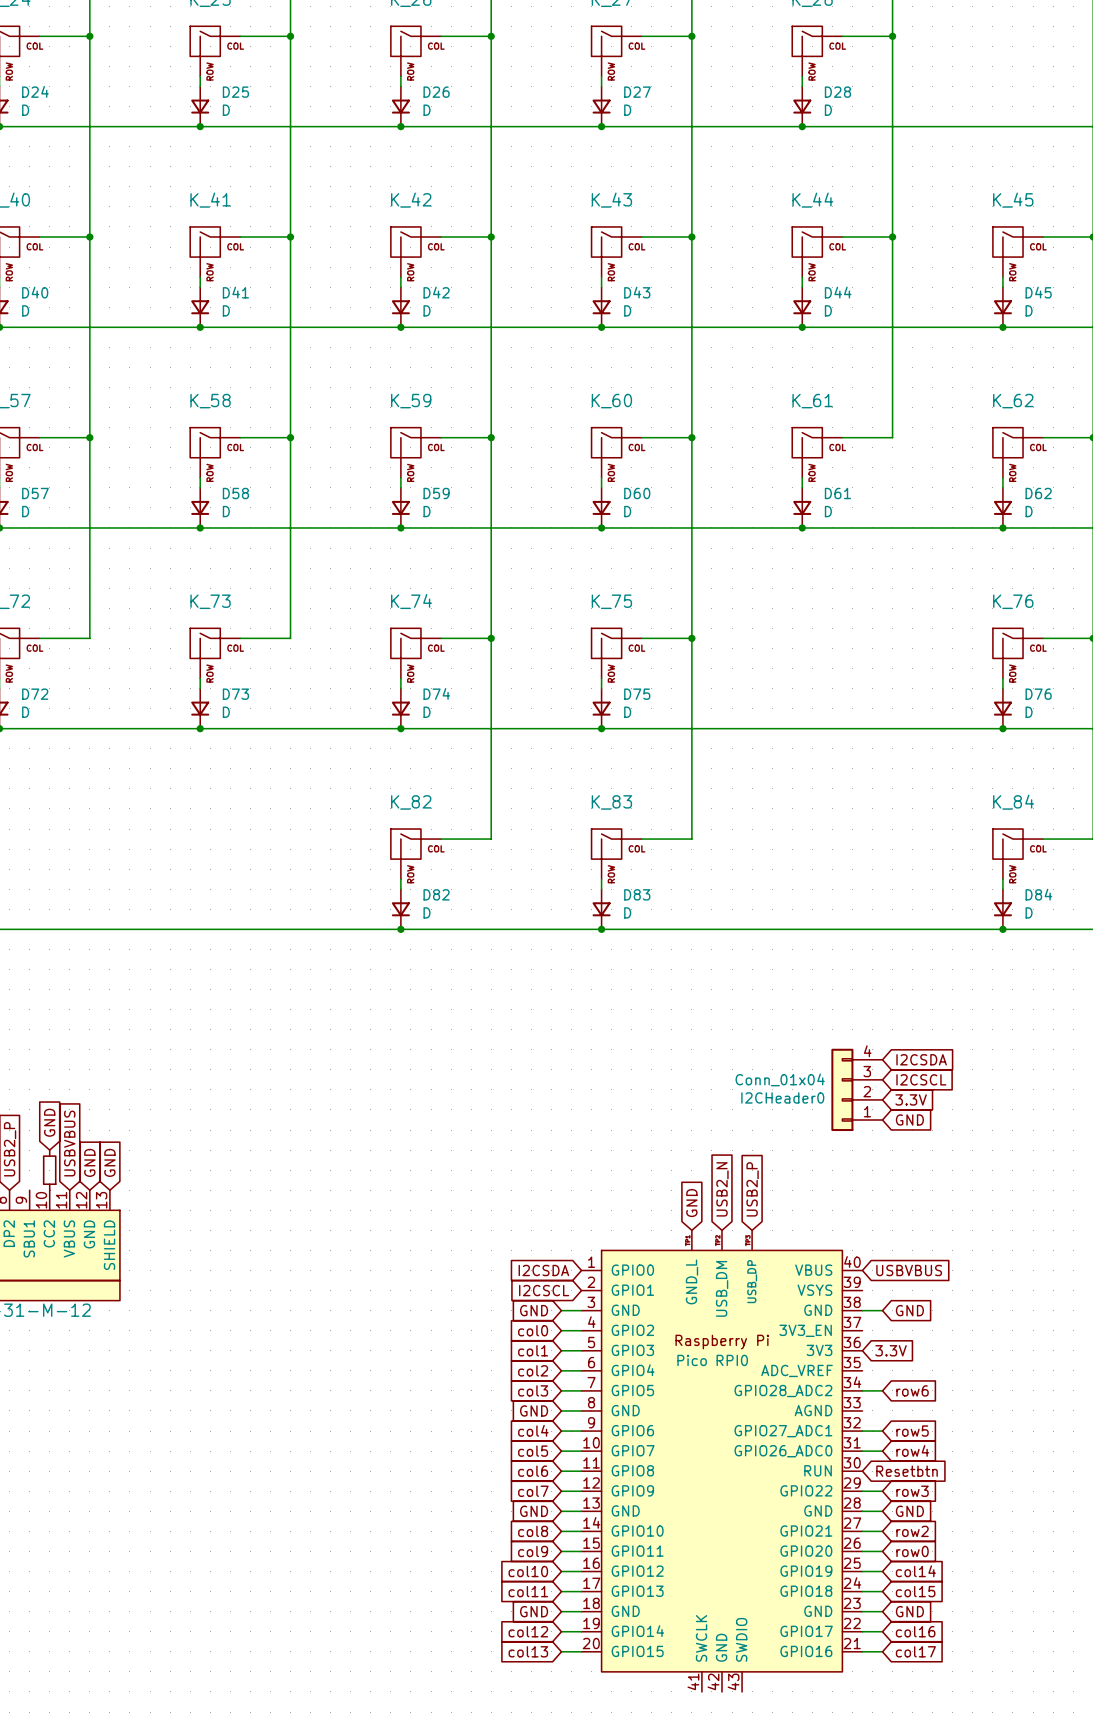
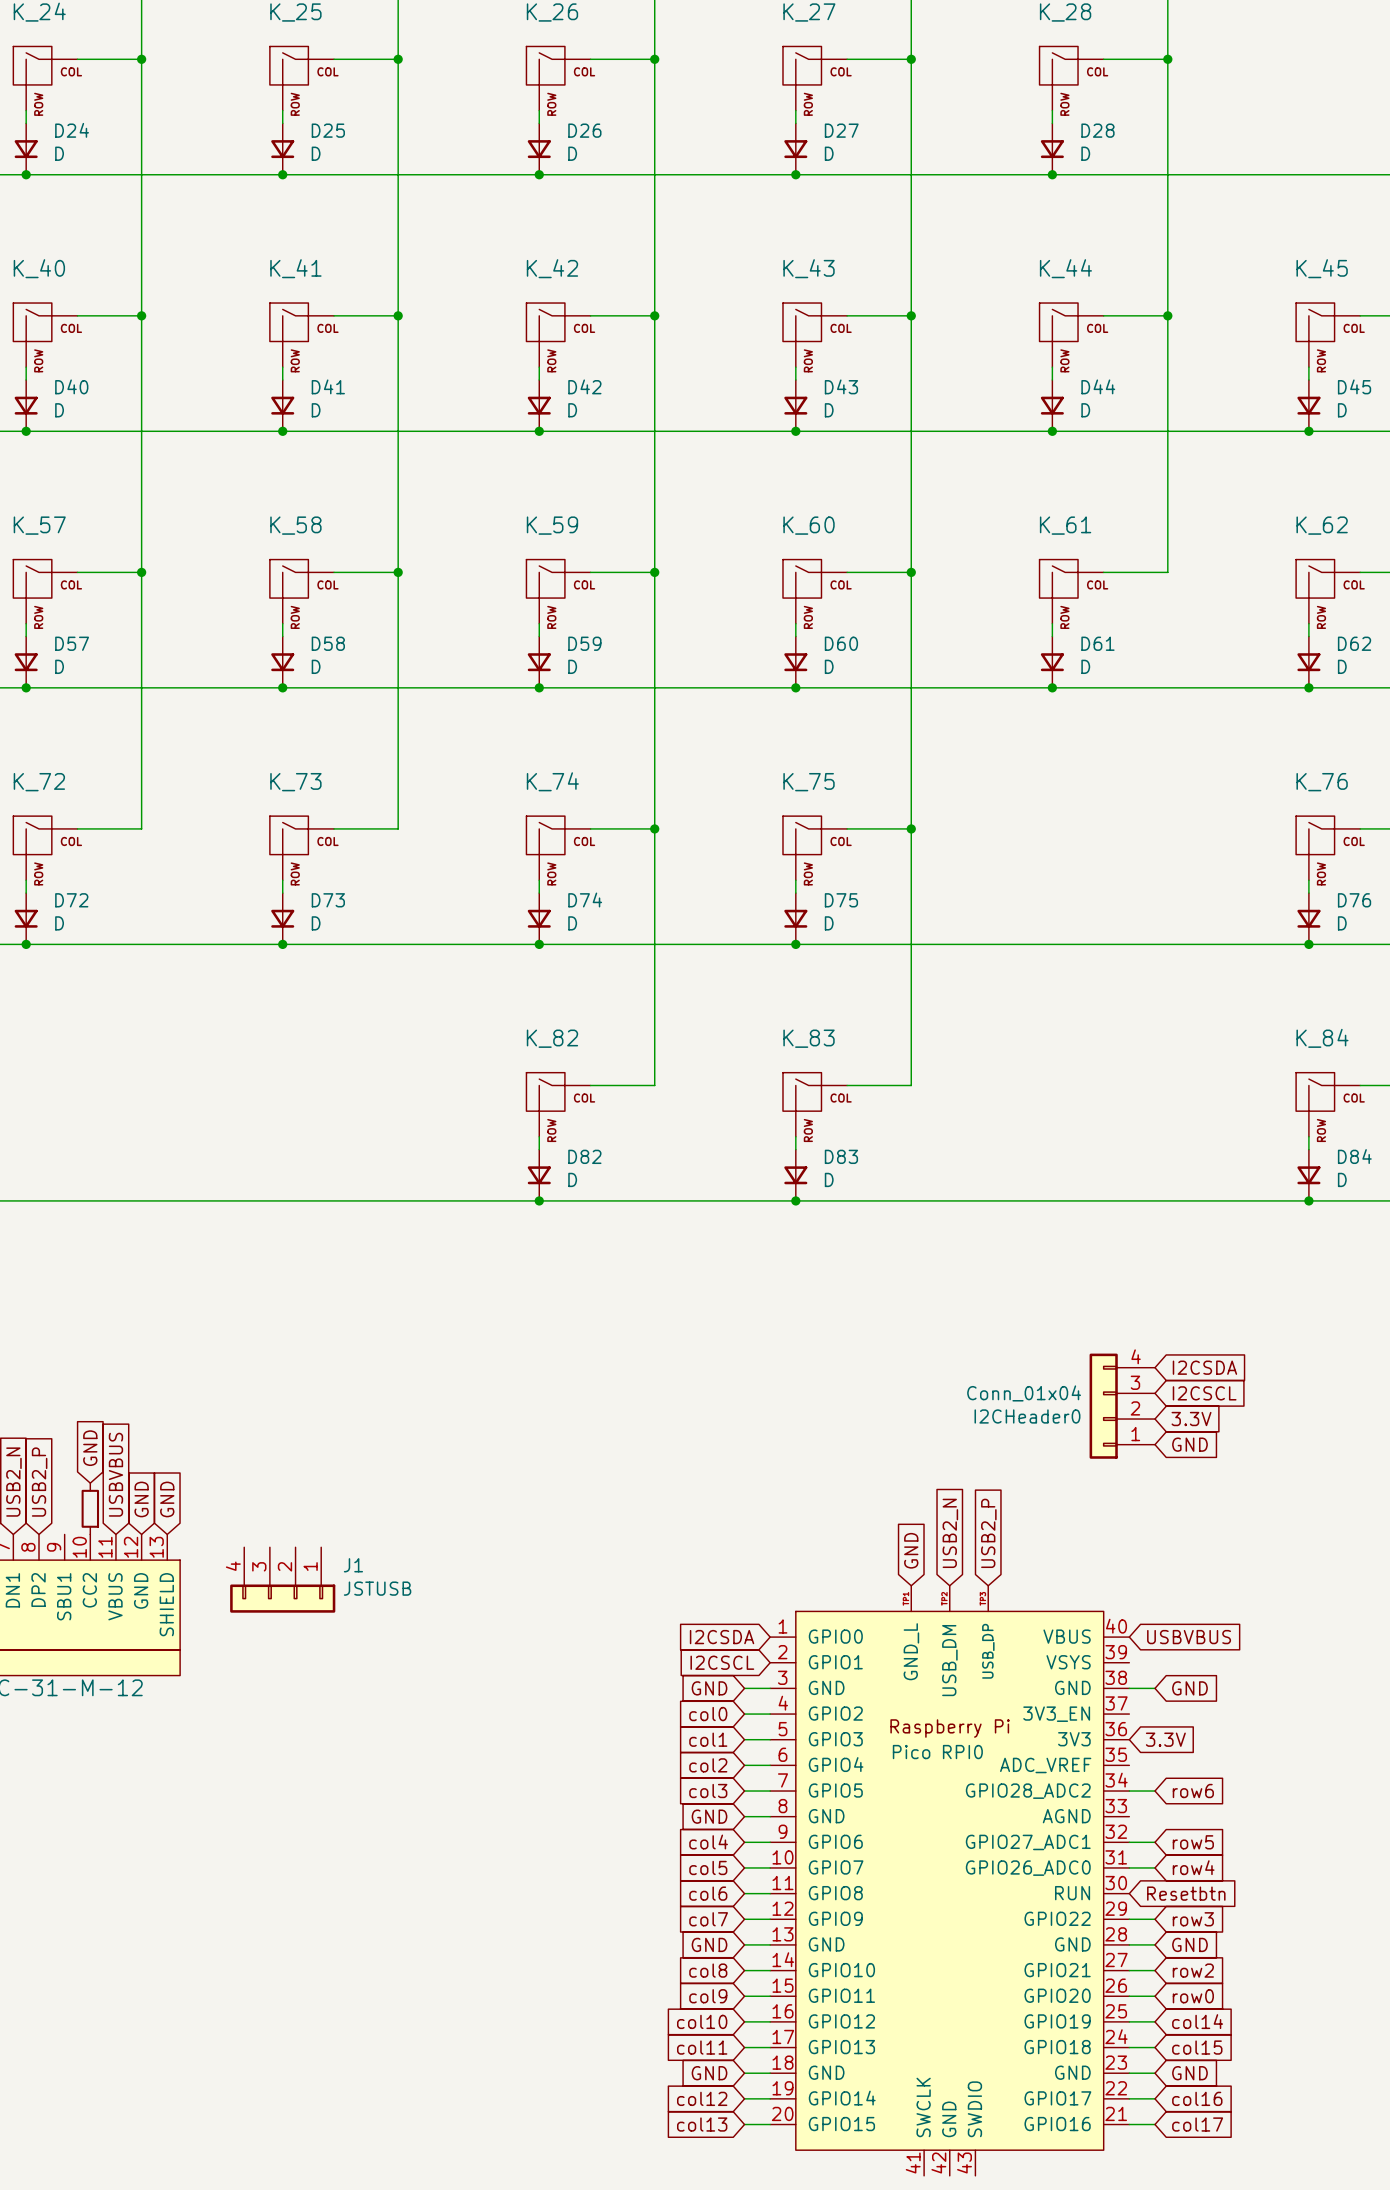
J1: none -> JSTUSB (282, 1579)

